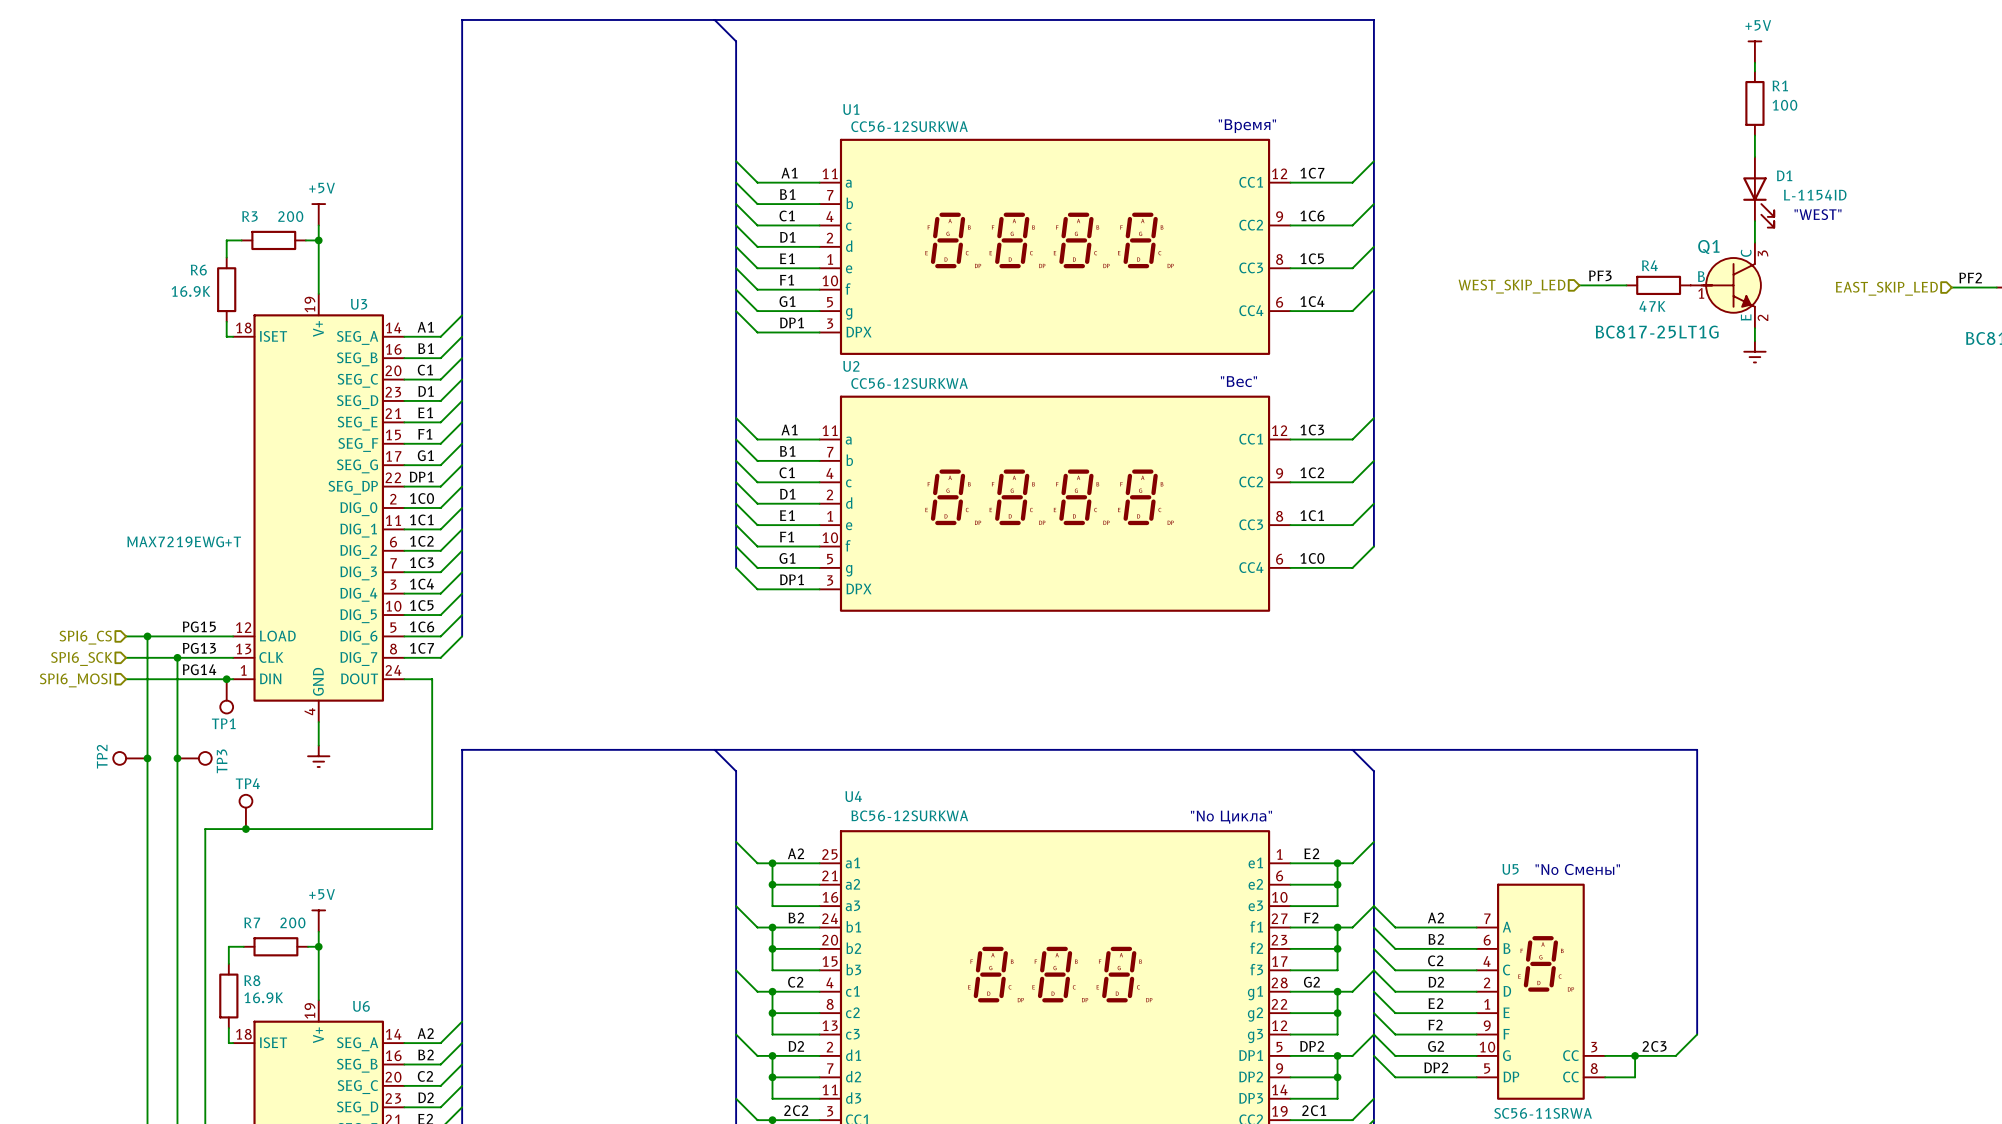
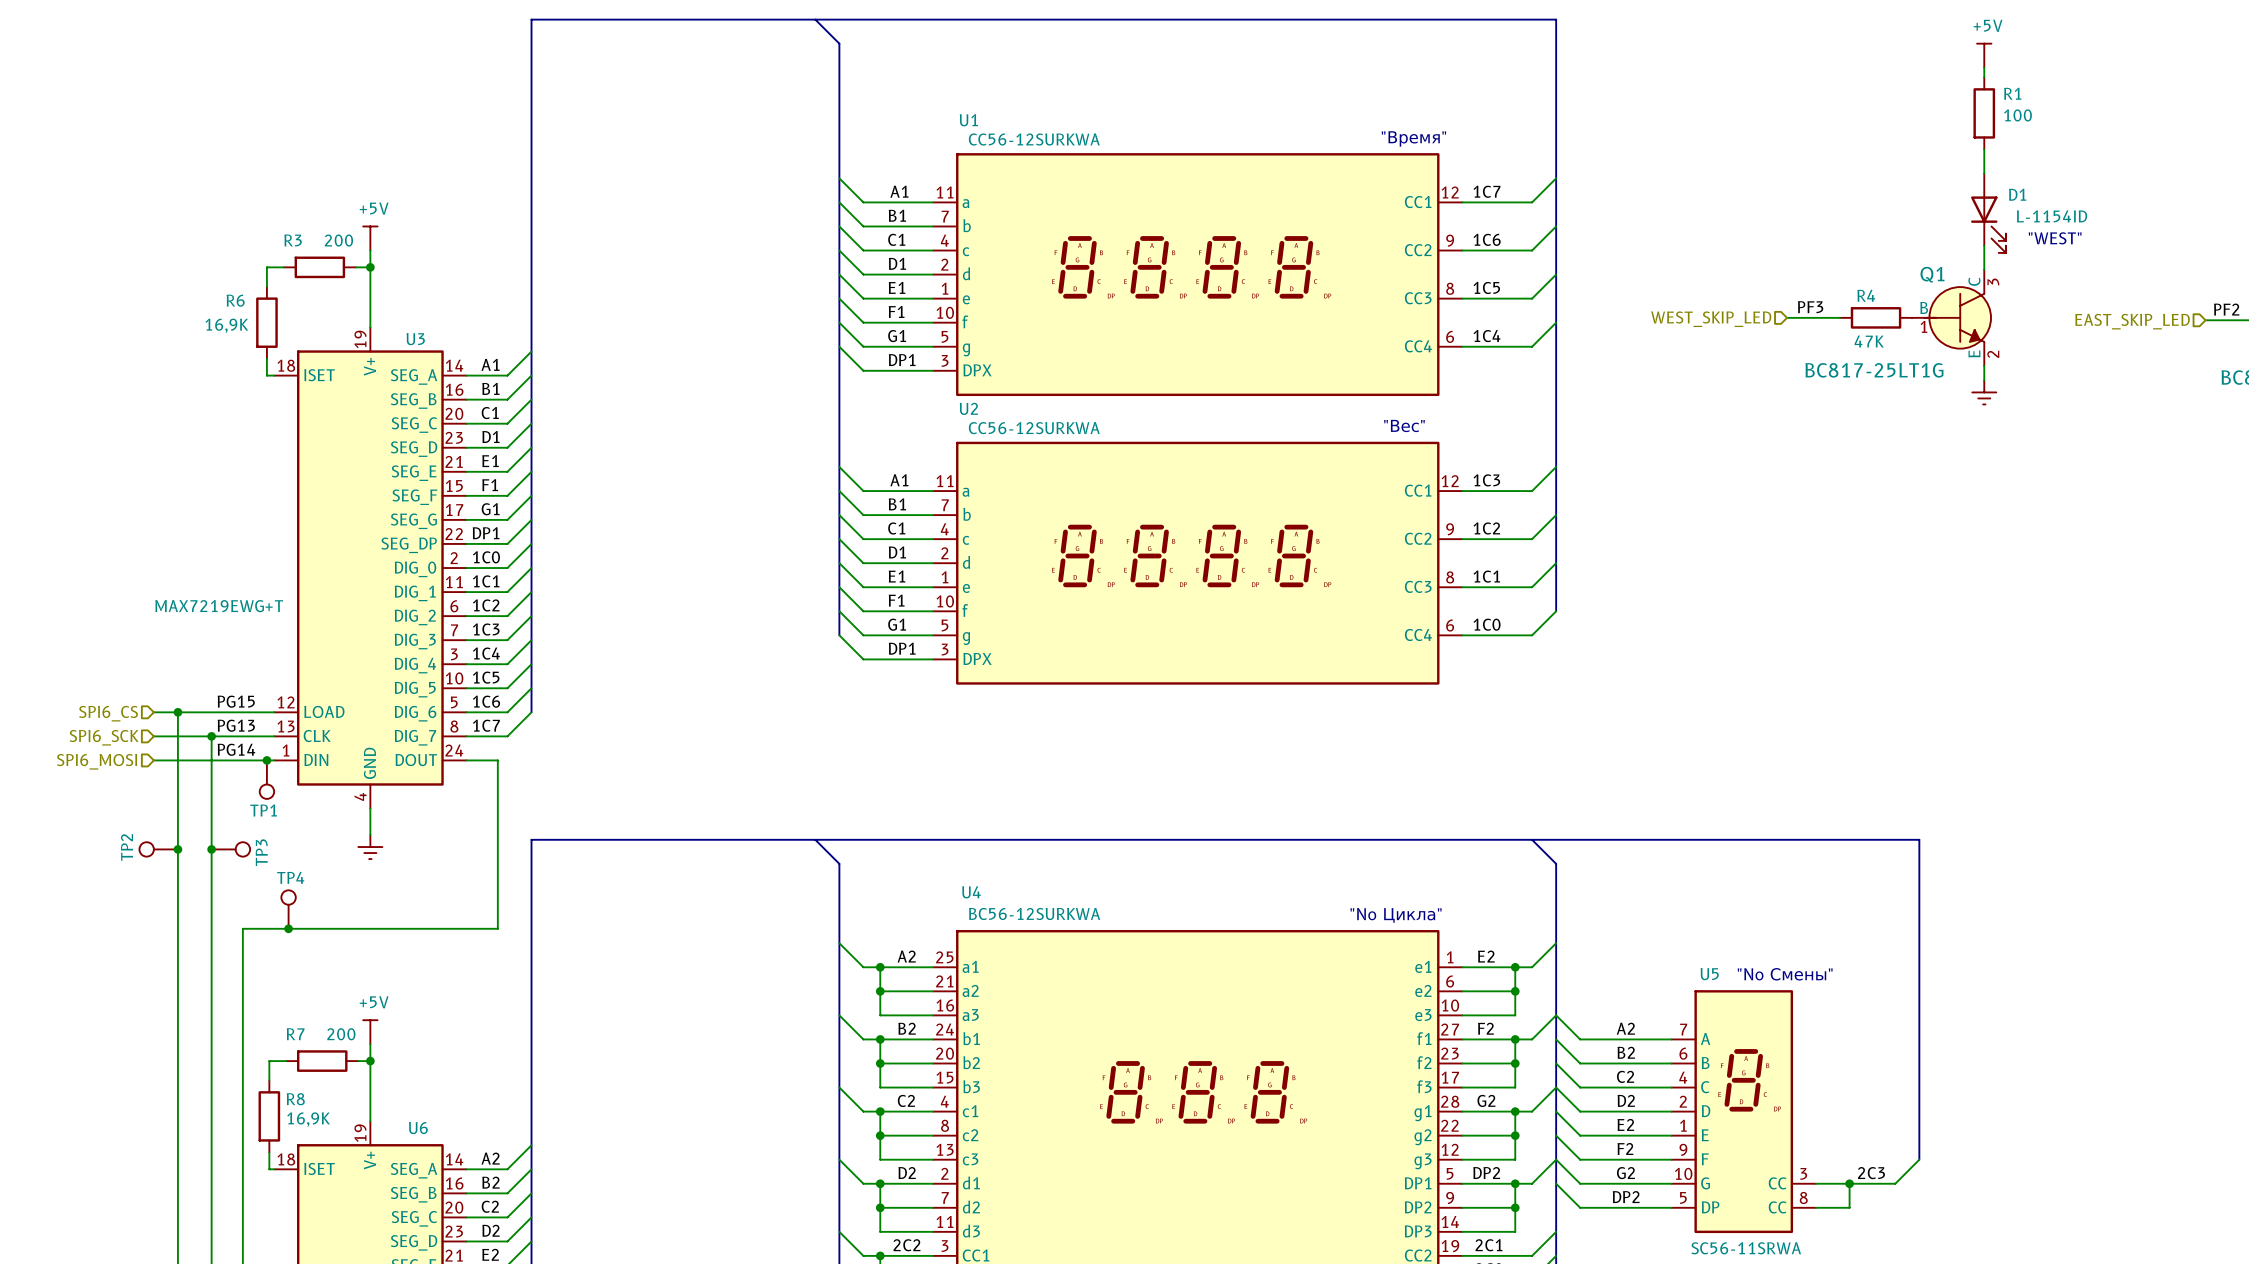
R6 value: 16.9K (190, 291) -> 16,9K (226, 325)
R8 value: 16.9K (263, 997) -> 16,9K (308, 1119)

